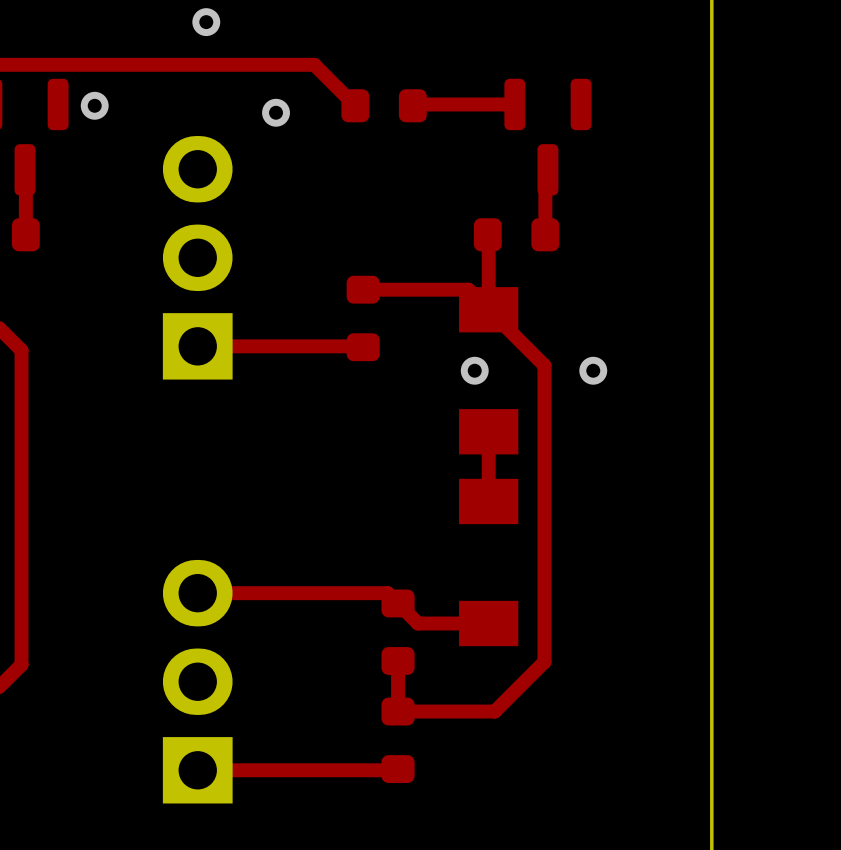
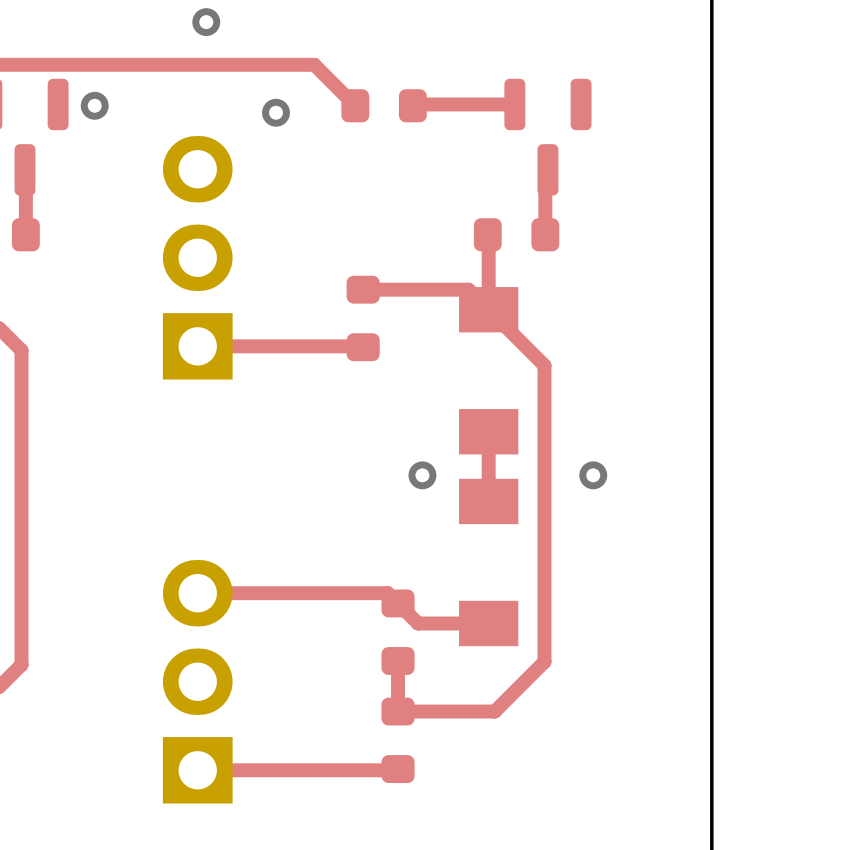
via: (474, 370) -> none
via: (593, 370) -> none
via: none -> (422, 475)
via: none -> (593, 475)

